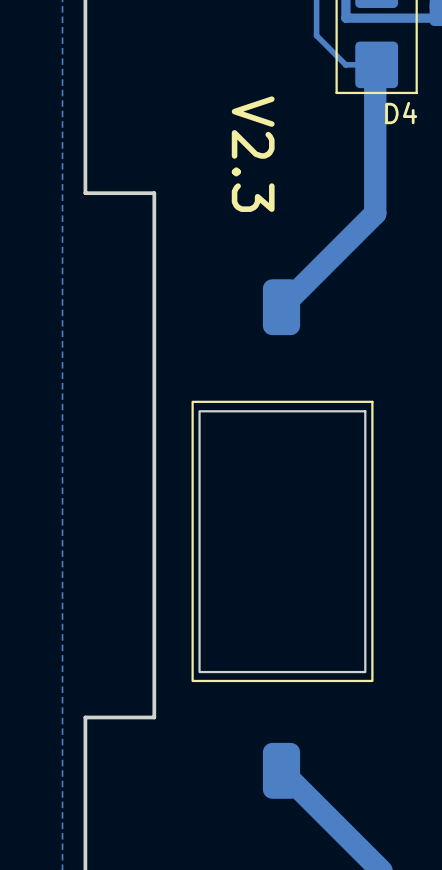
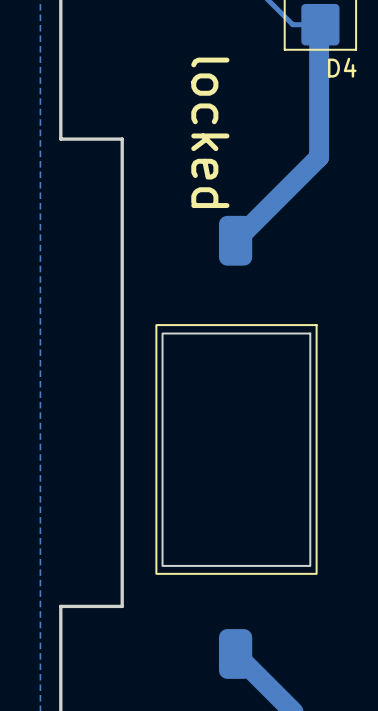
text: V2.3 (253, 154) -> locked (210, 132)

